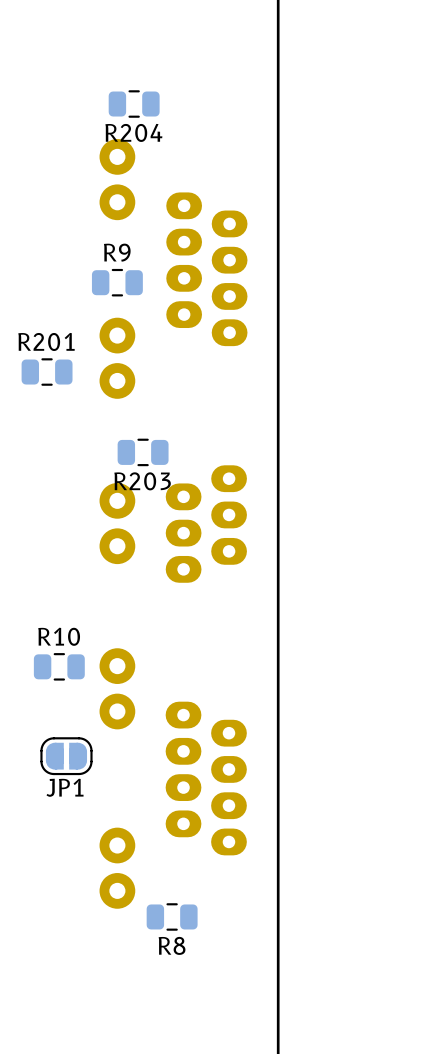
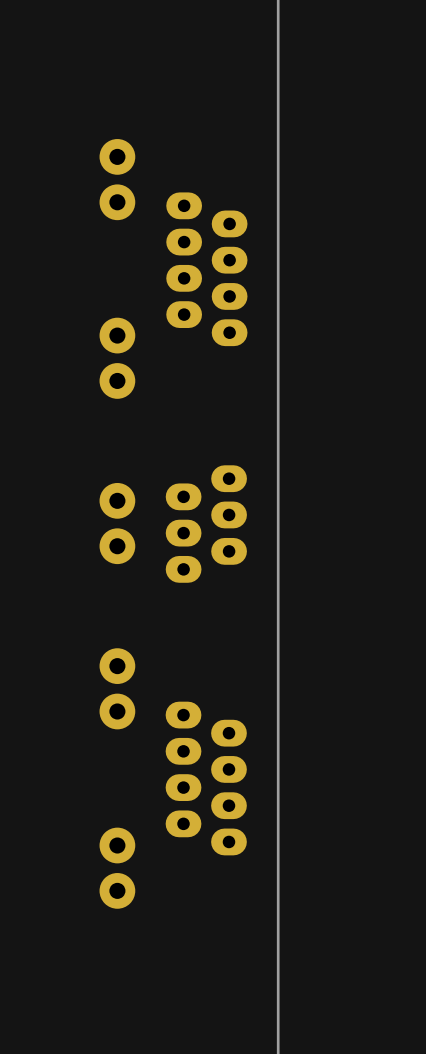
R204: (134, 104) -> none
R9: (117, 282) -> none
R201: (47, 372) -> none
R203: (143, 452) -> none
R10: (59, 666) -> none
JP1: (66, 756) -> none
R8: (172, 916) -> none

